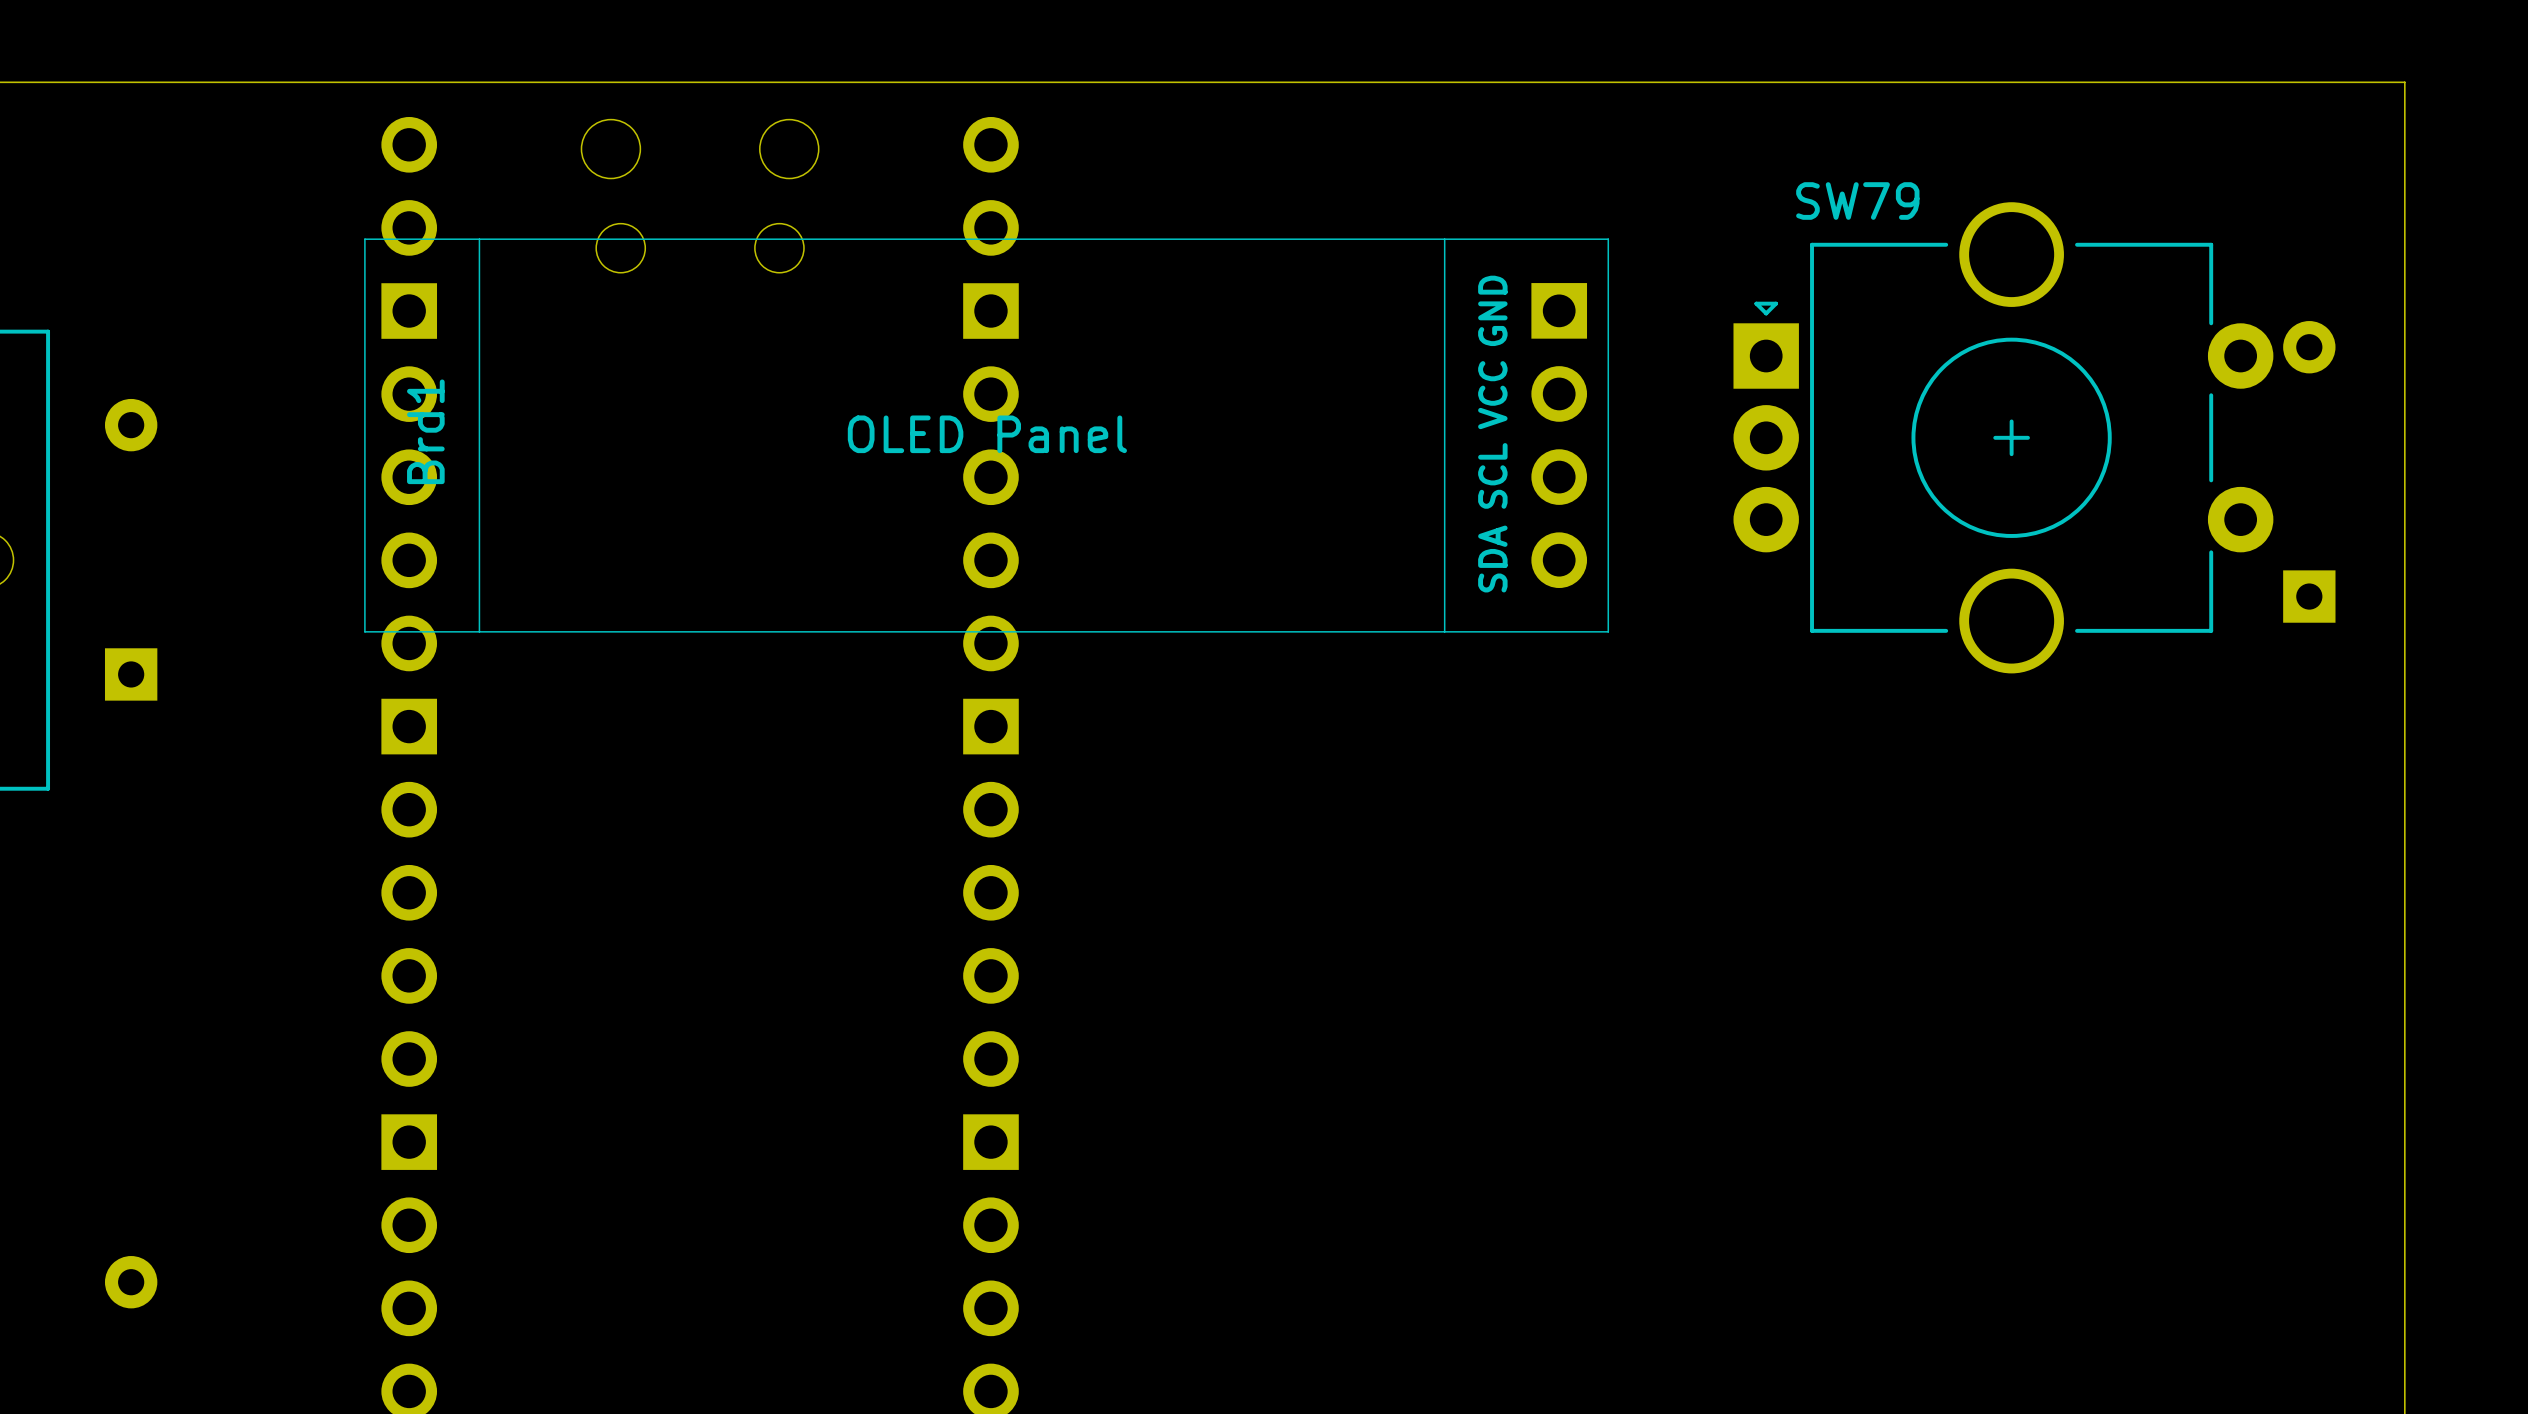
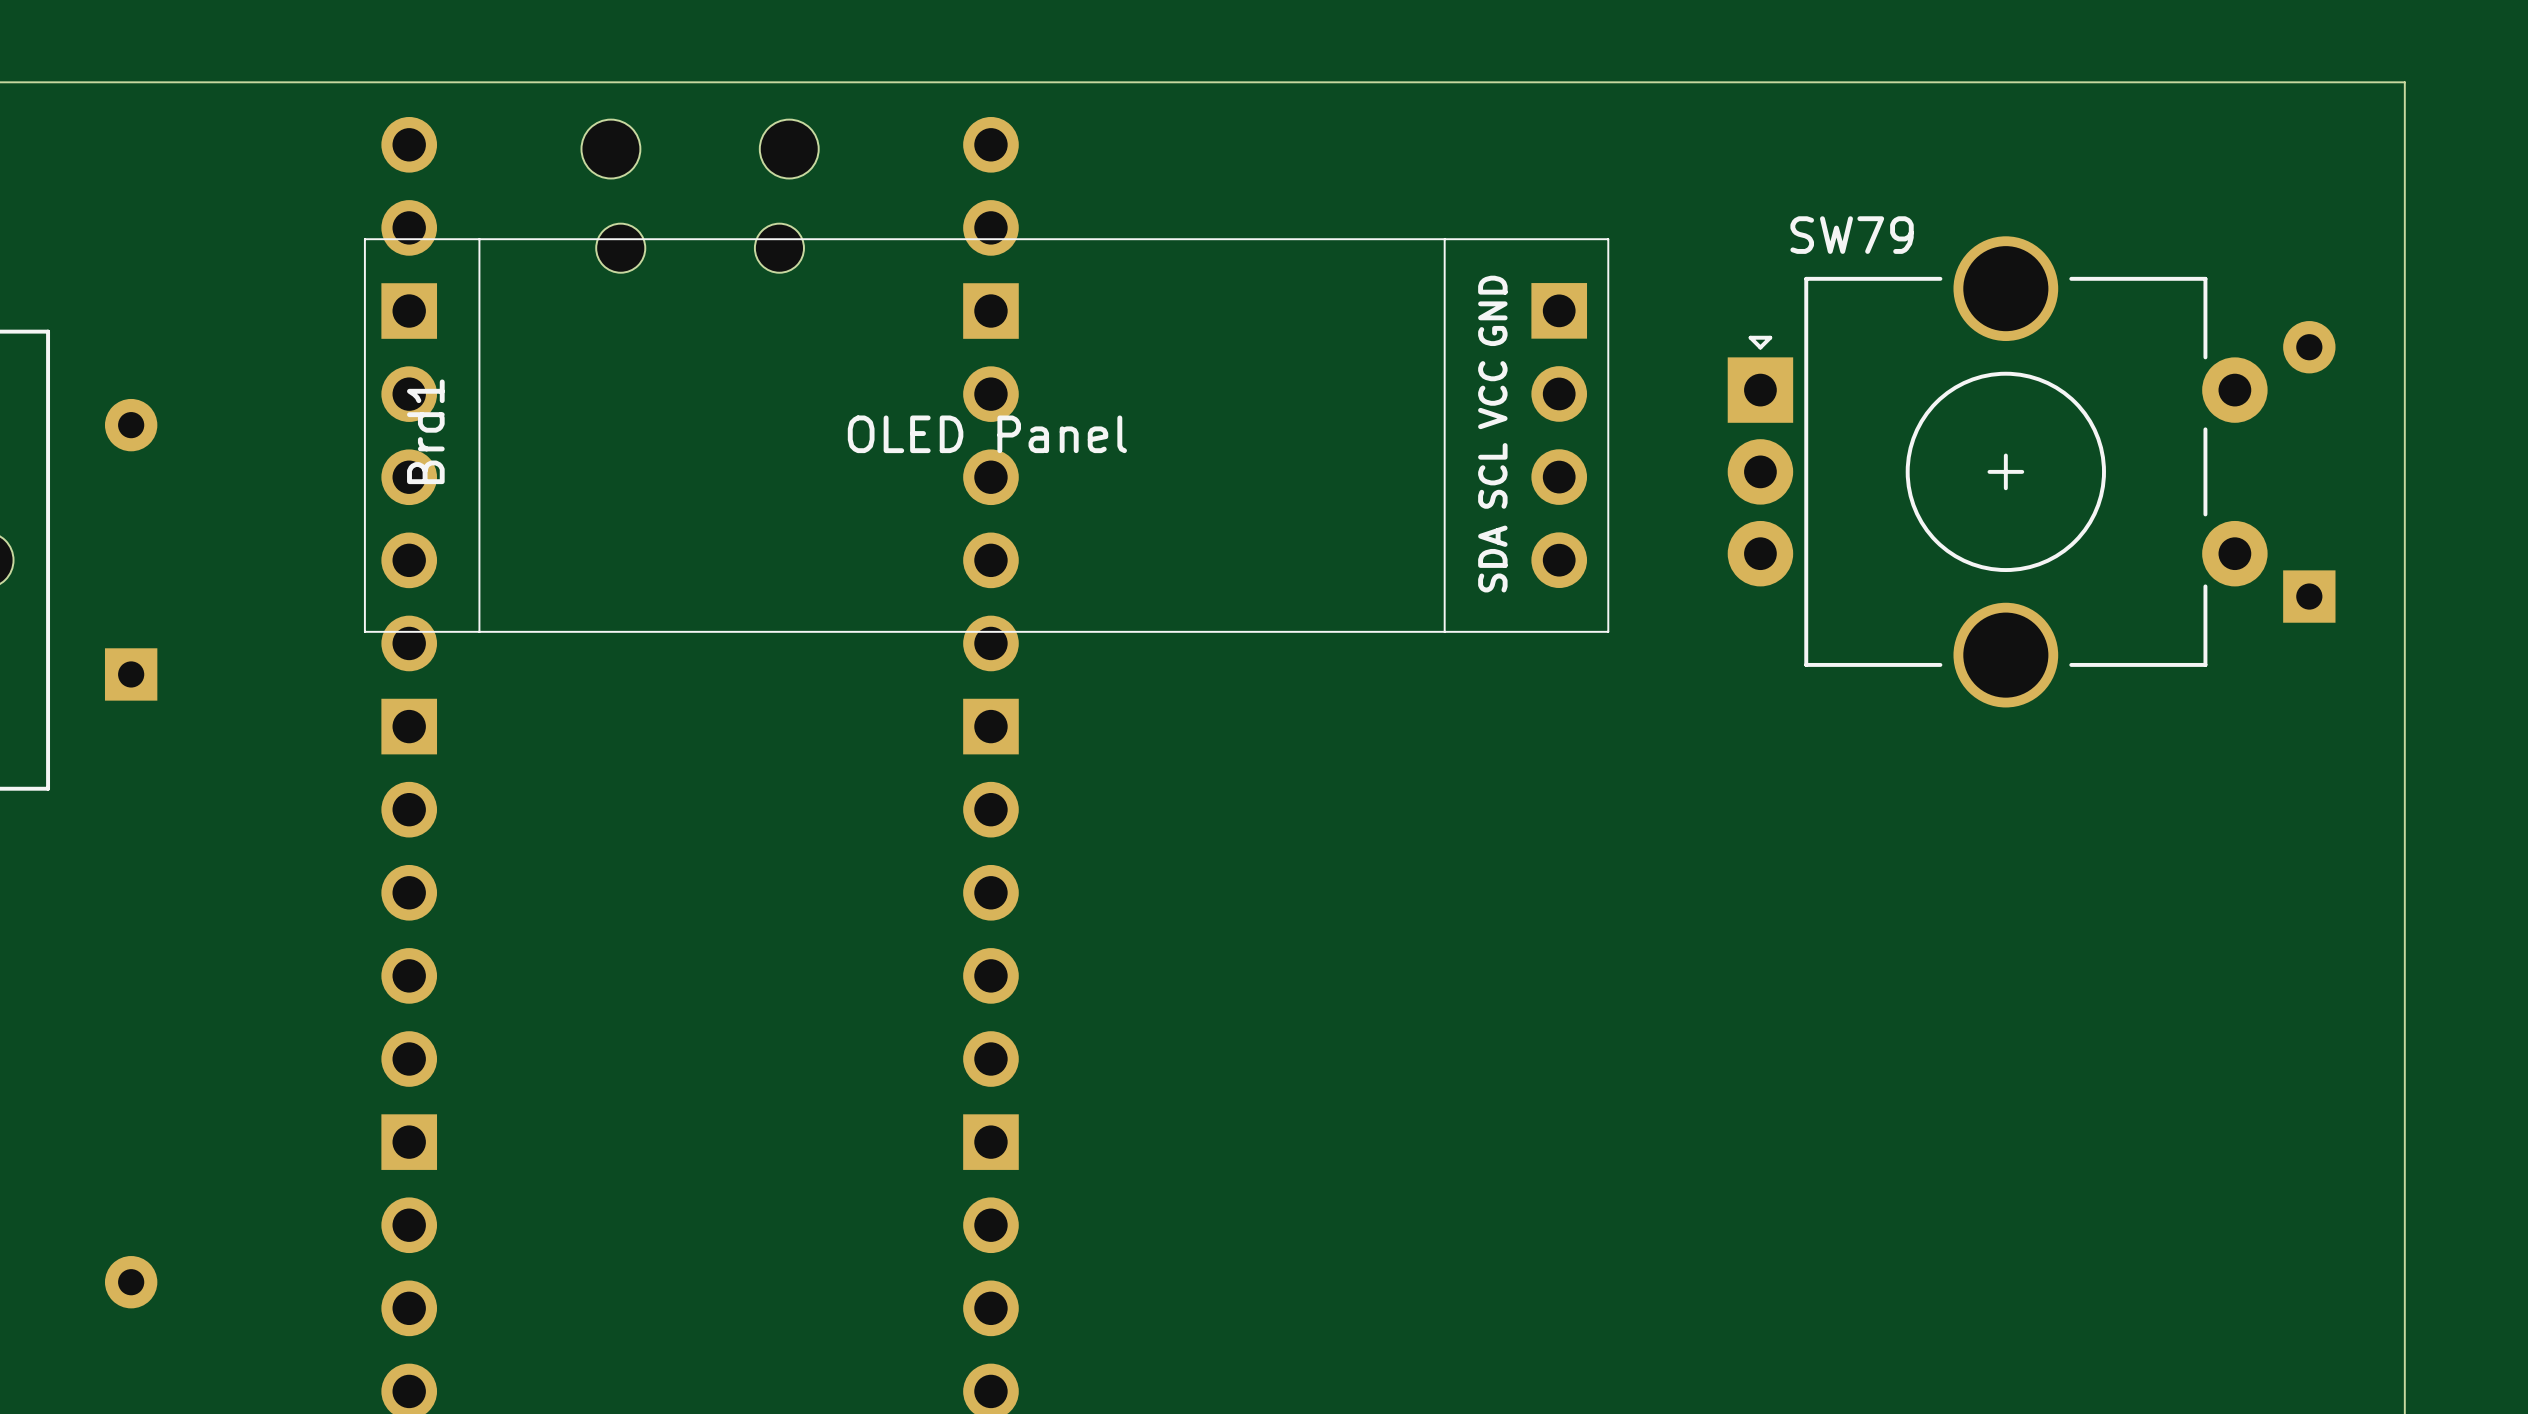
SW79 position: (2003, 437) -> (1997, 471)

